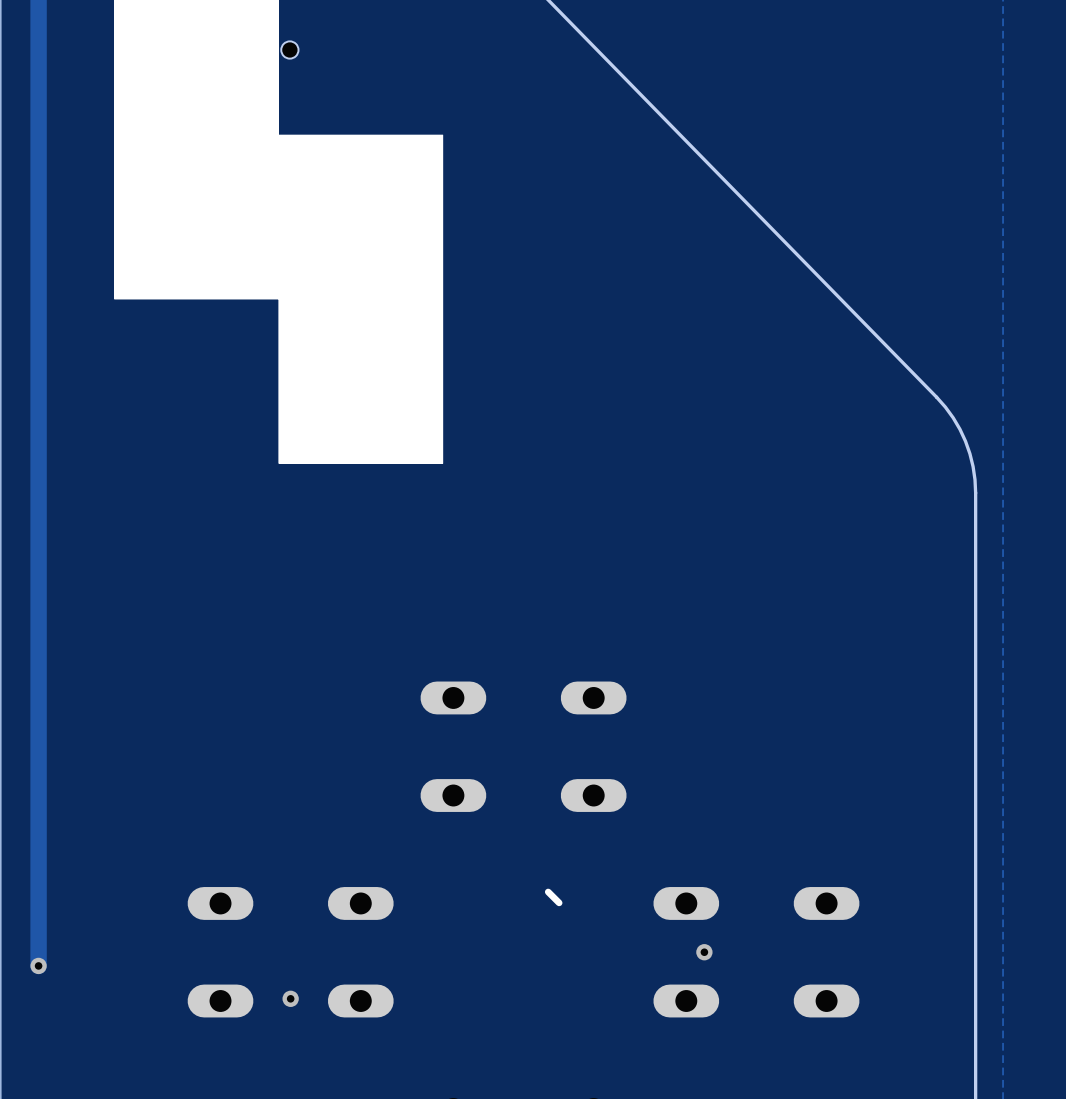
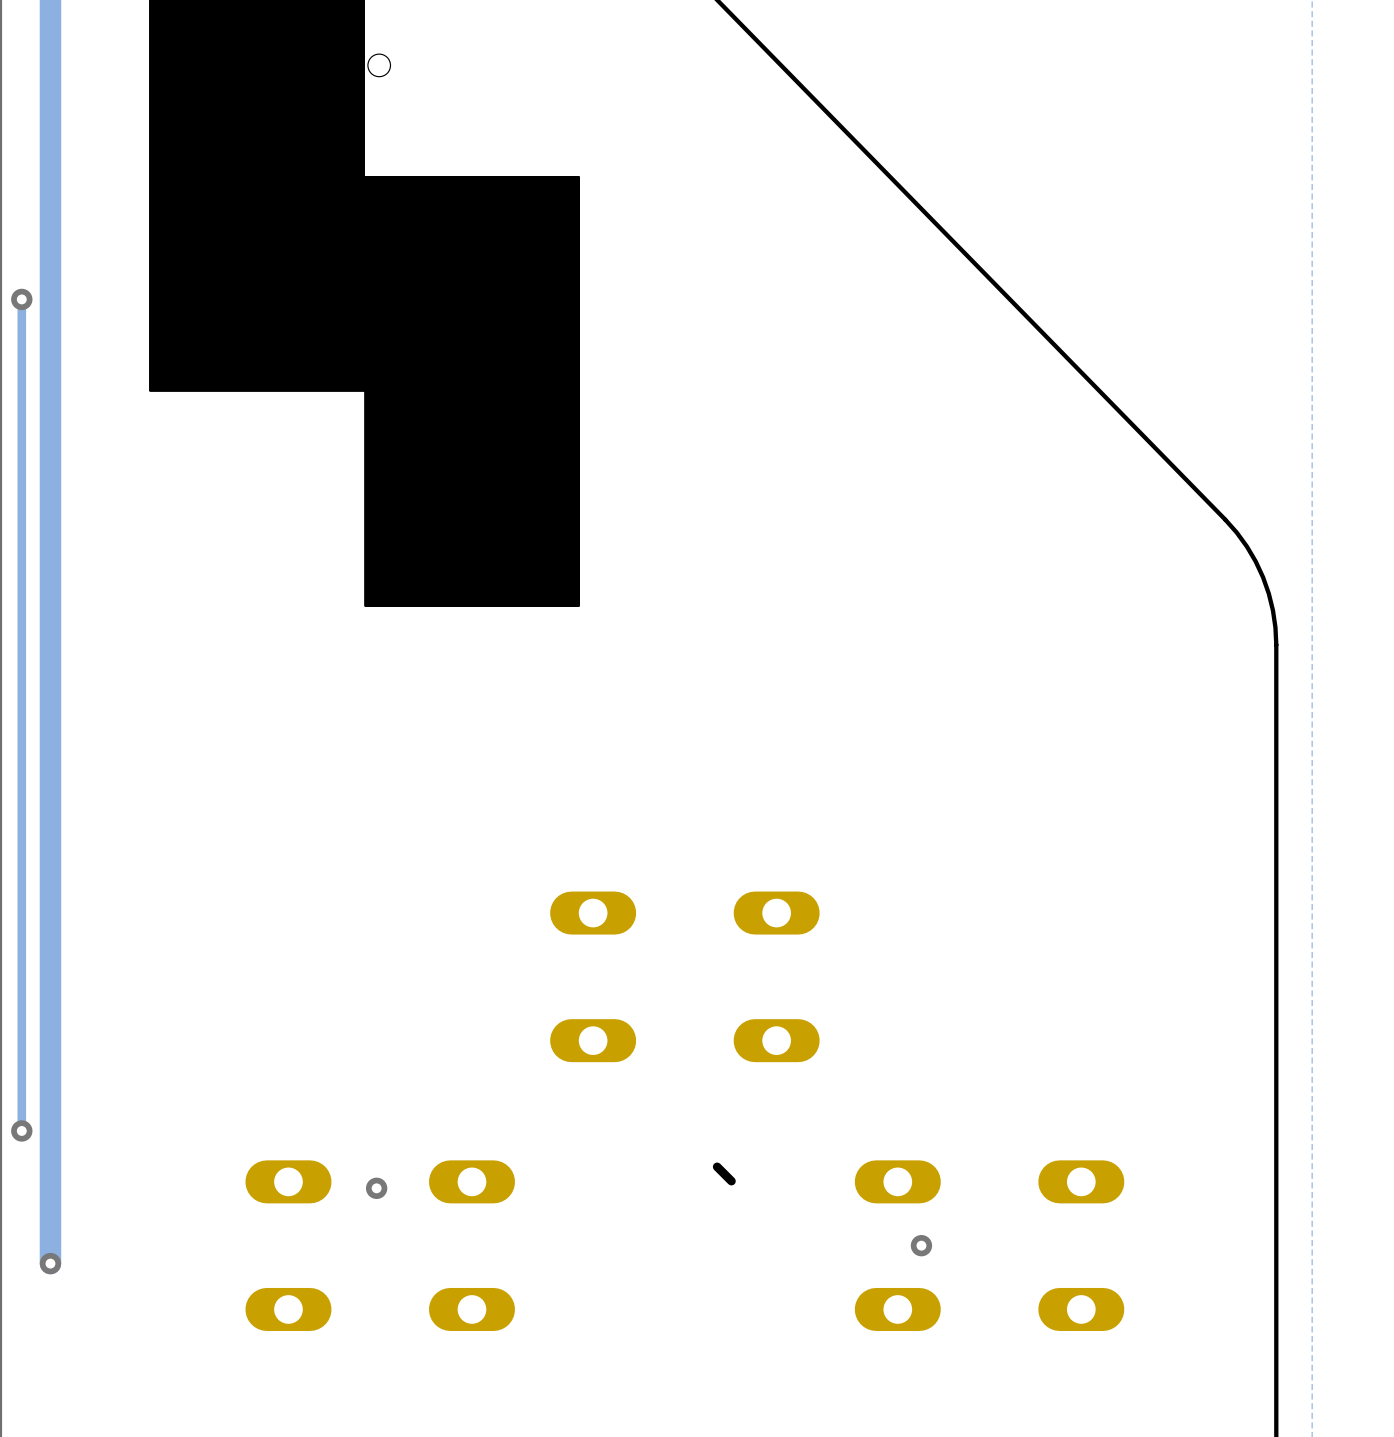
track: none -> (21, 299) (21, 1130)
via: none -> (21, 299)
via: none -> (21, 1130)
via position: (290, 998) -> (376, 1188)

